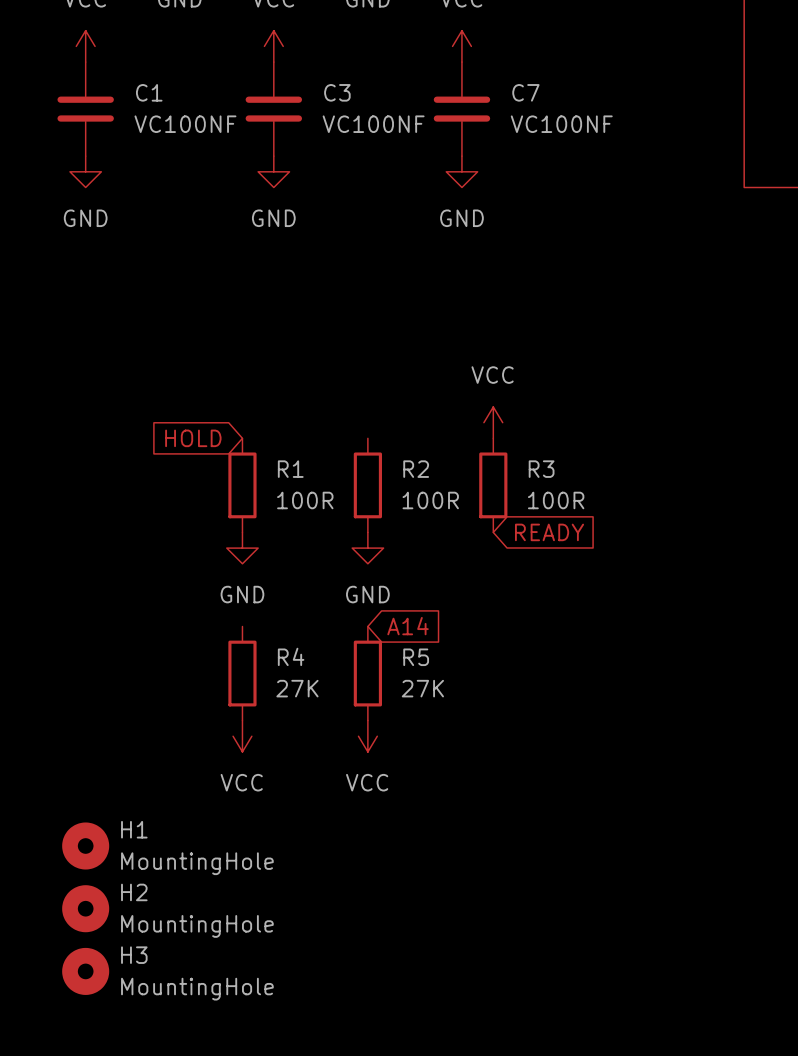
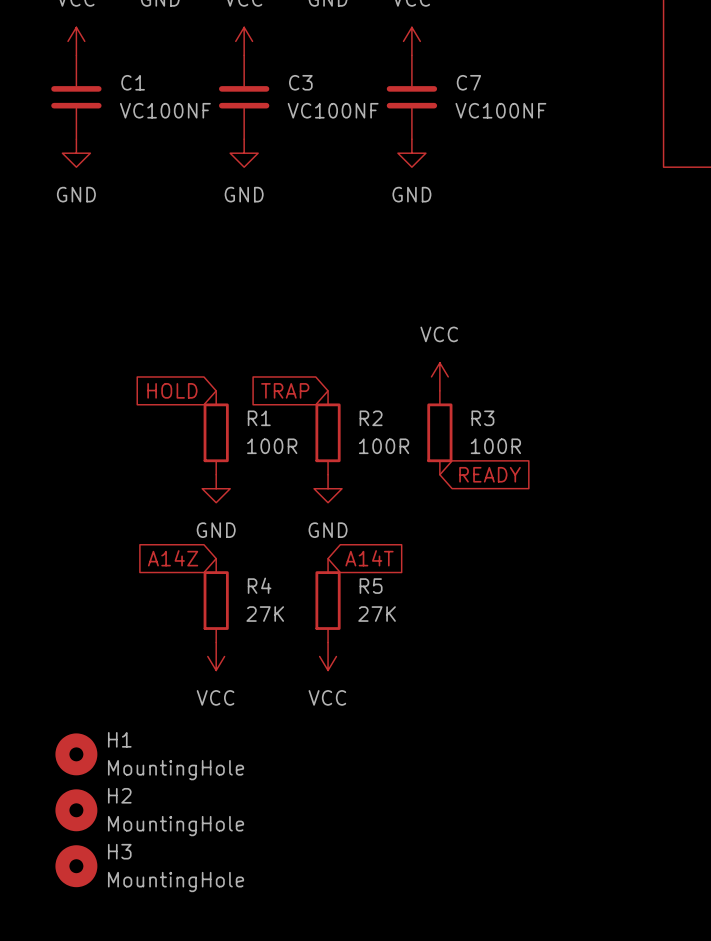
global label: none -> TRAP (285, 390)
global label: none -> A14Z (173, 558)
global label: A14 (408, 626) -> A14T (369, 558)

